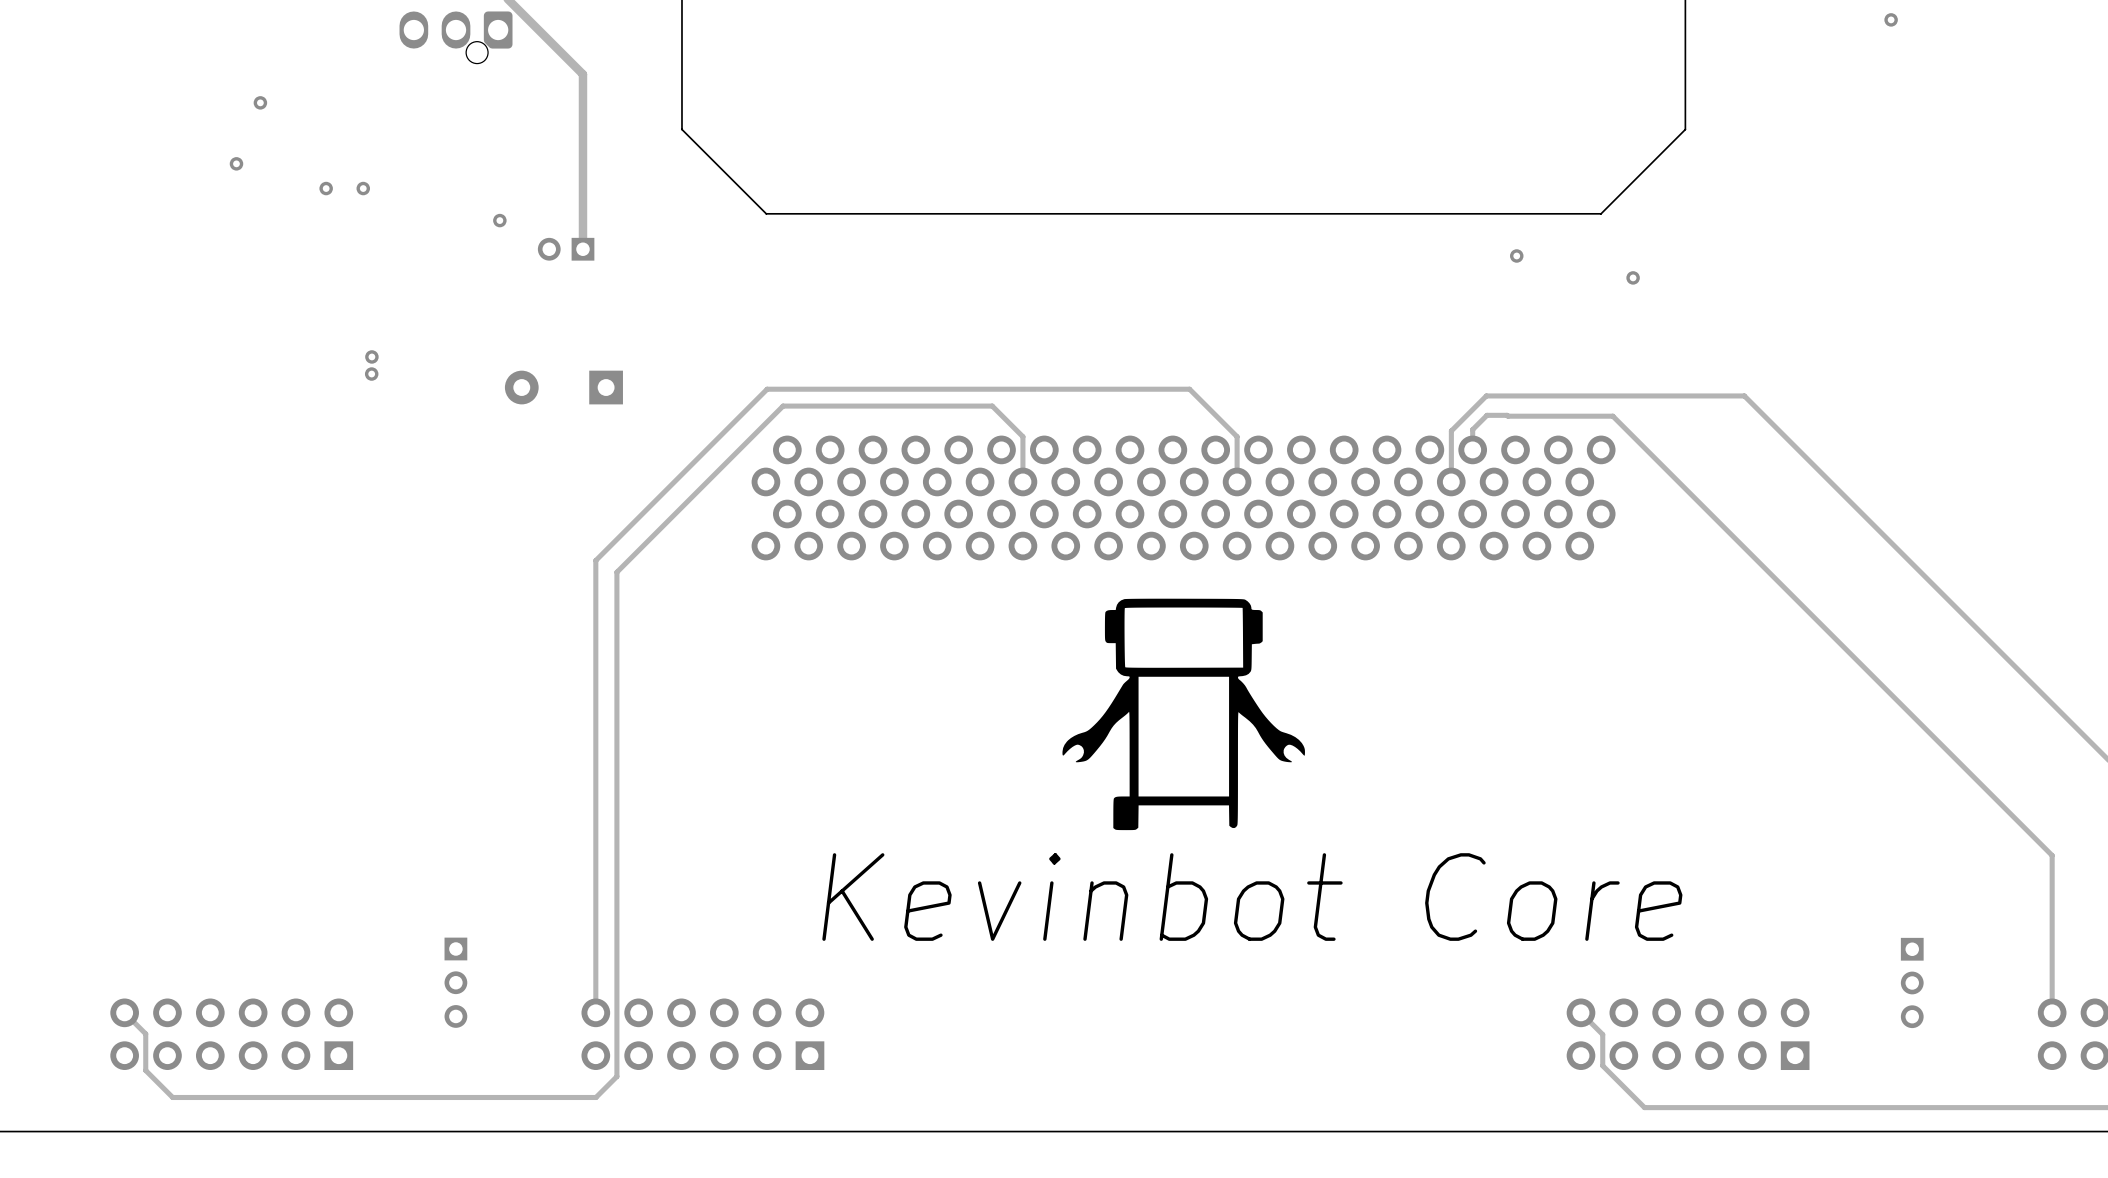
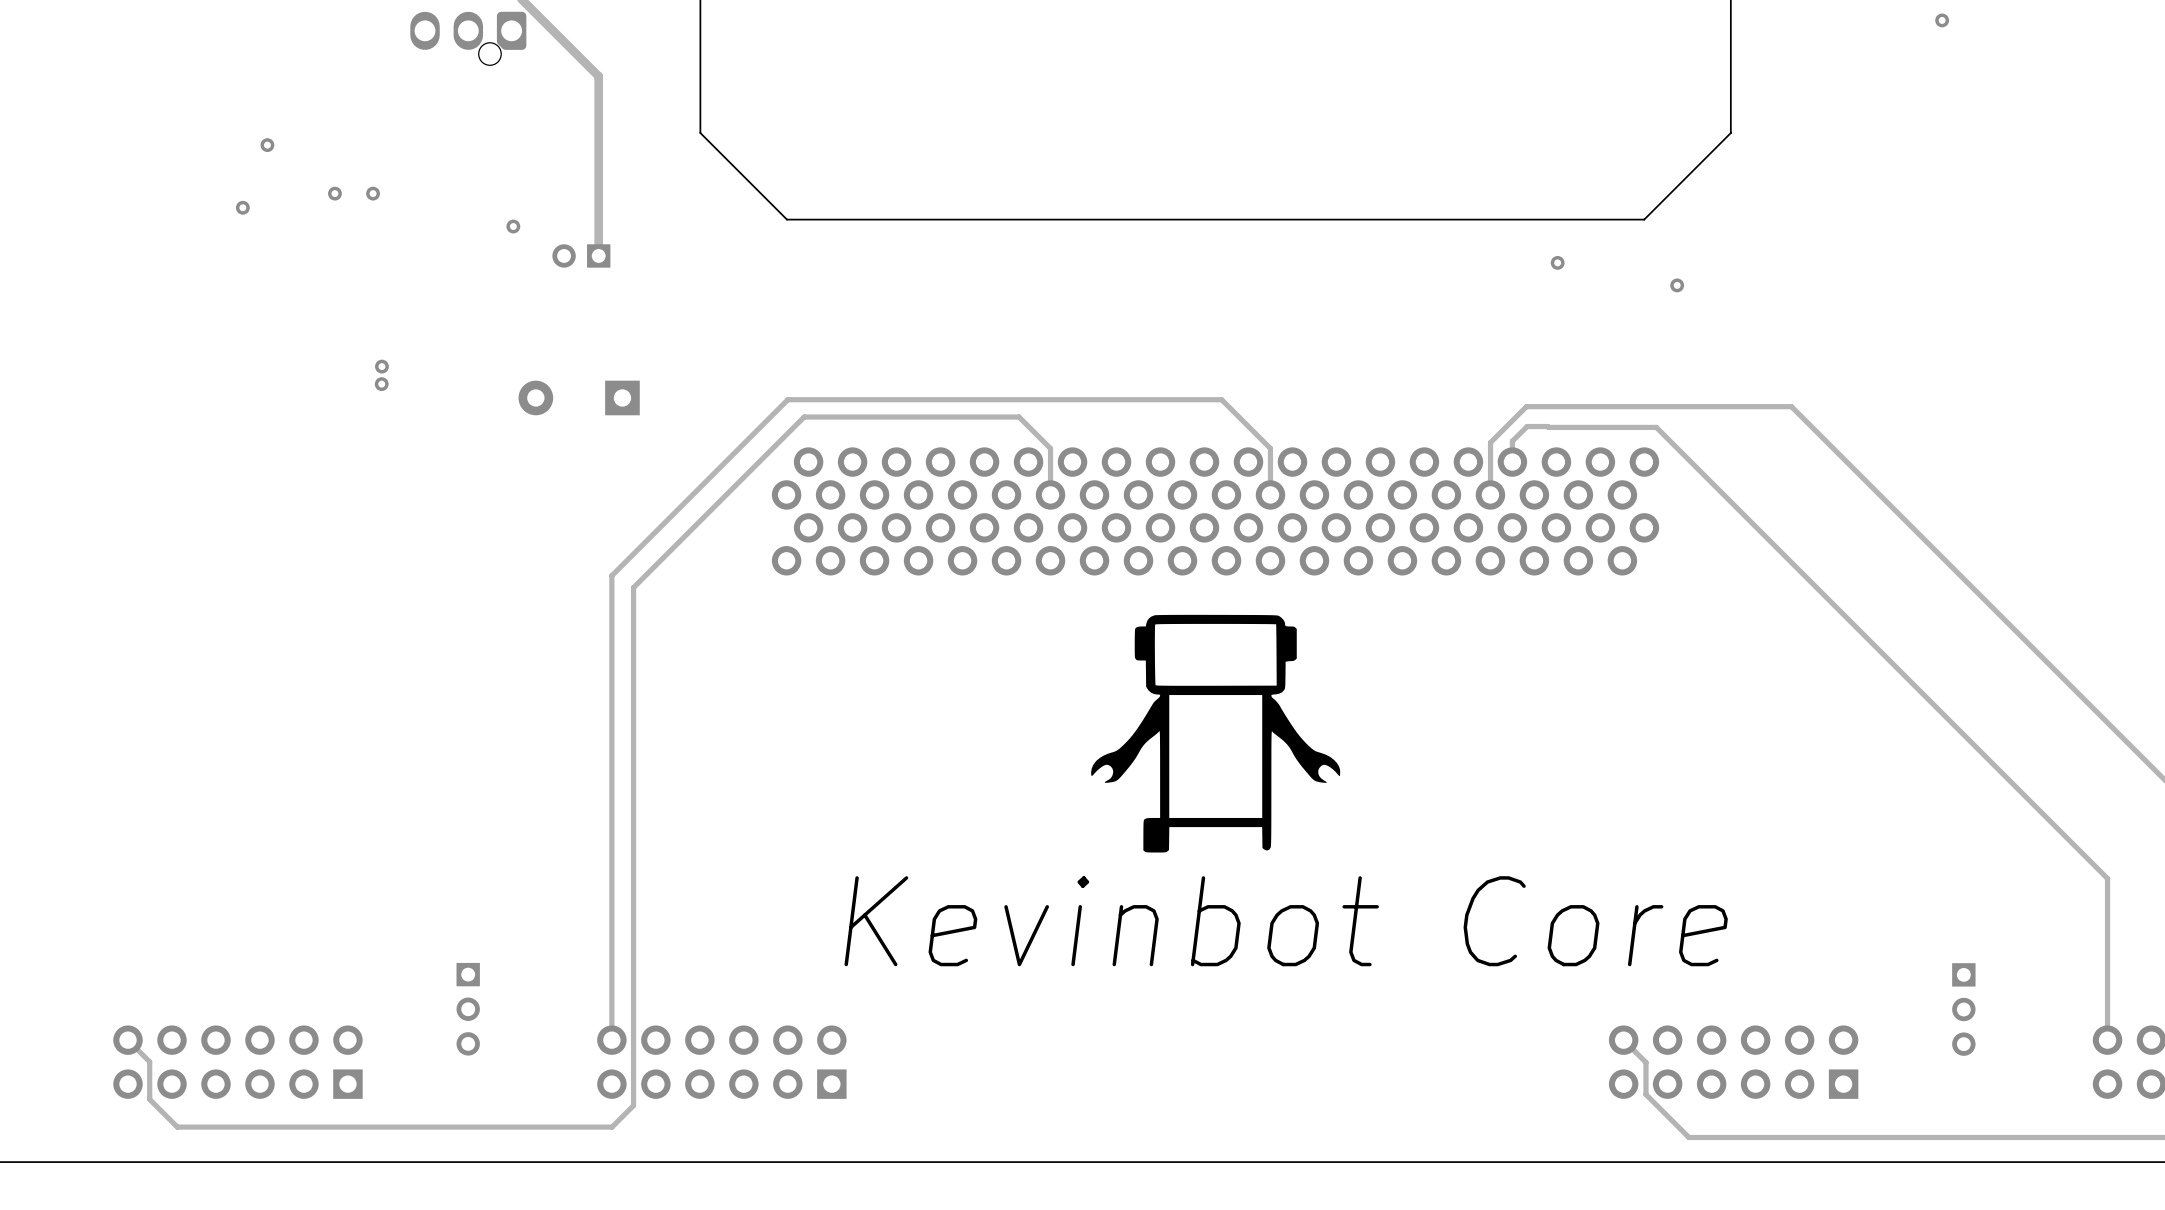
via: (260, 102) -> none
via: none -> (267, 145)
via: (236, 163) -> none
via: none -> (242, 207)

